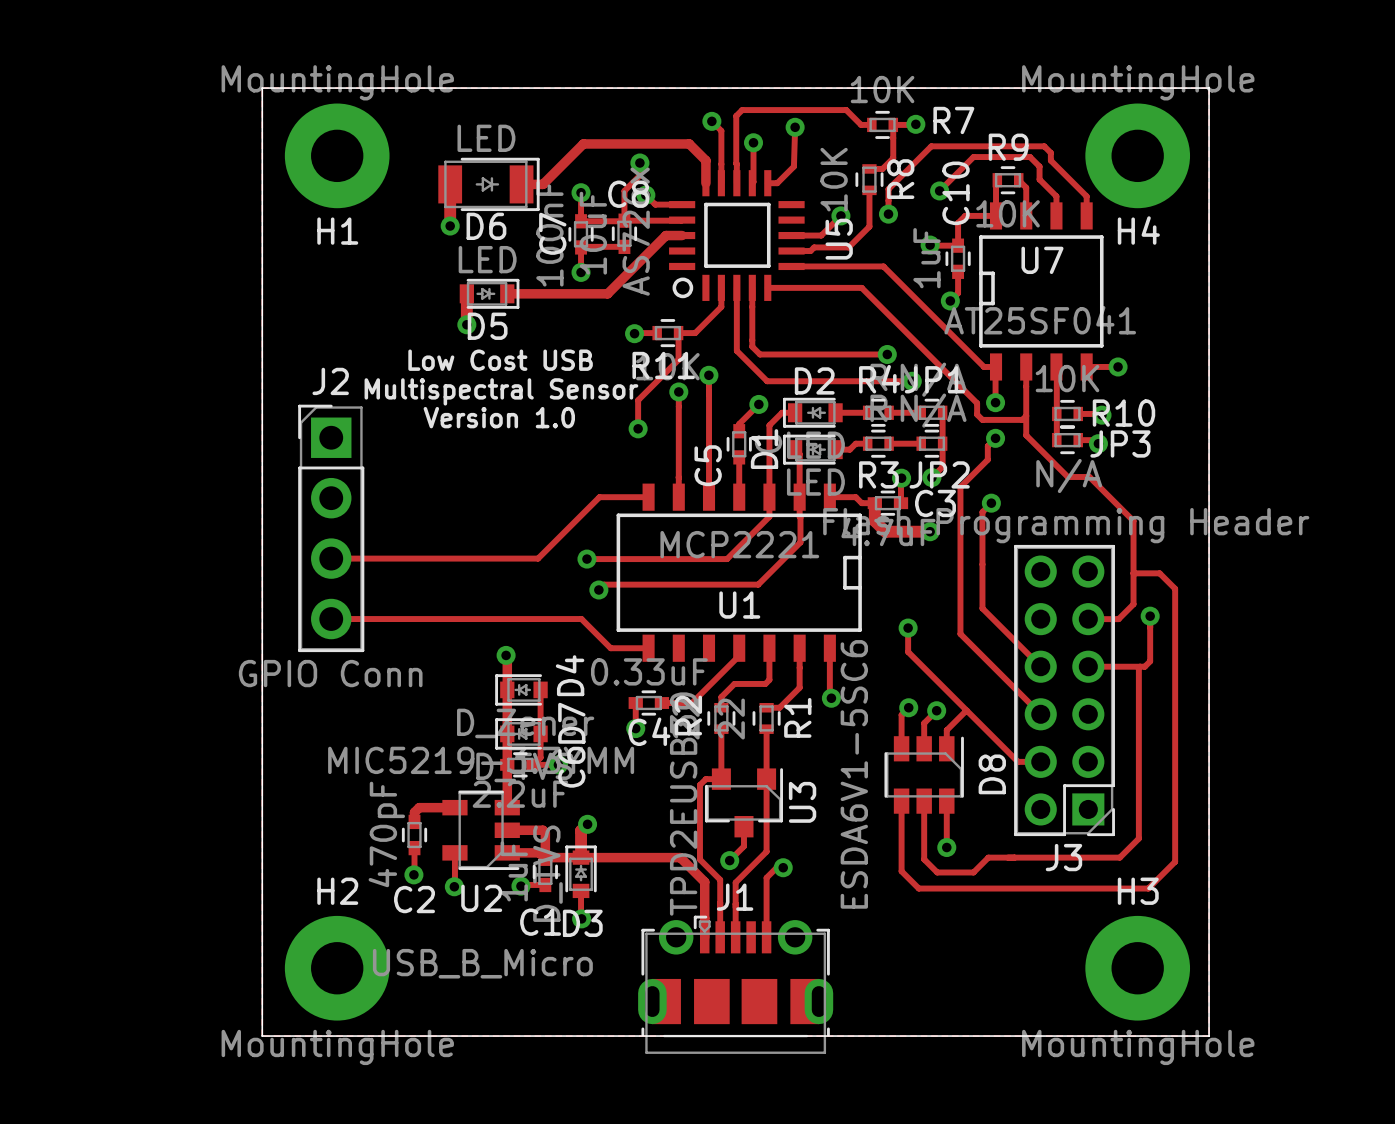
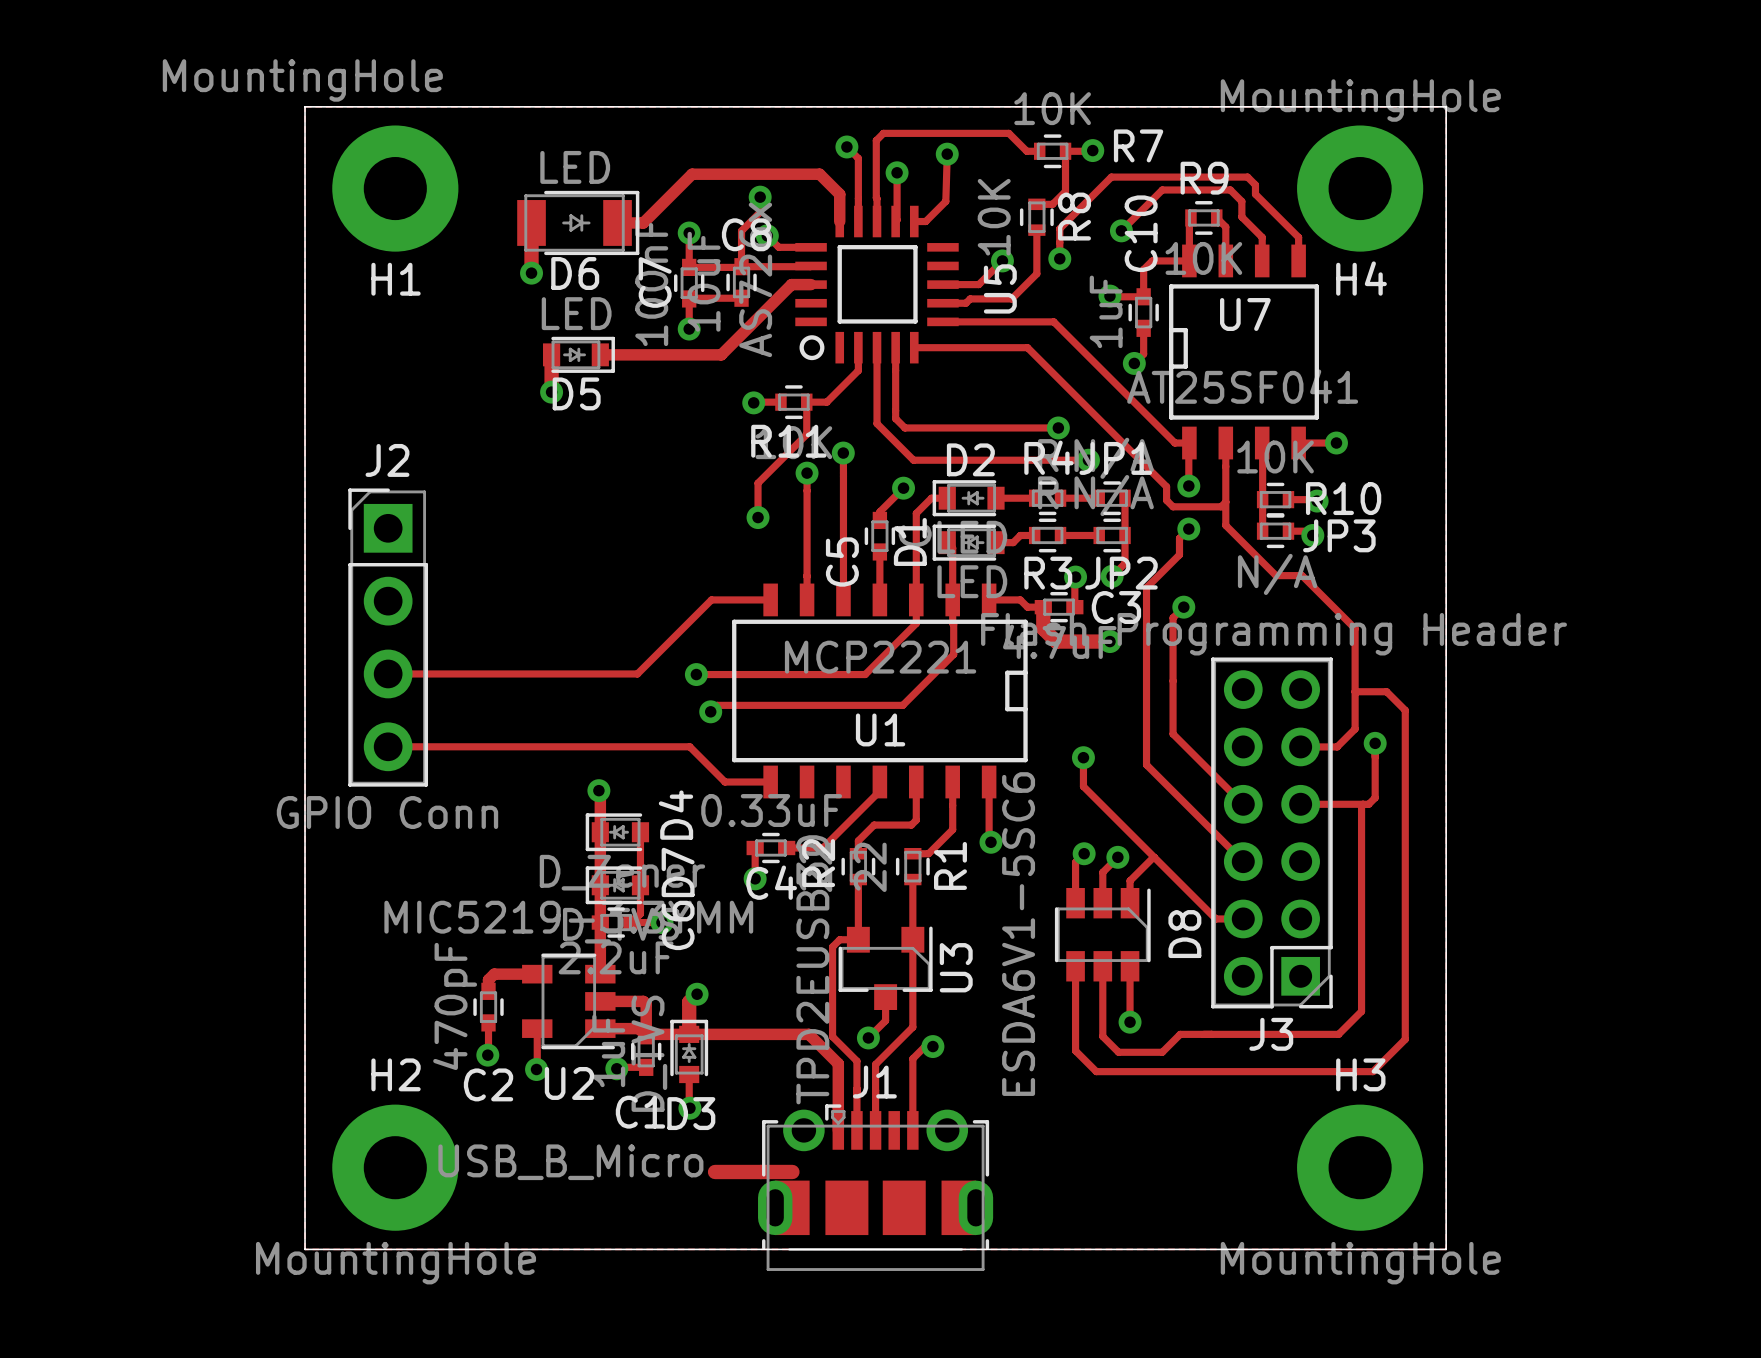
H1 value position: MountingHole (337, 82) -> MountingHole (302, 80)
text: Low Cost USB (500, 360) -> none
text: Multispectral Sensor (501, 391) -> none
text: Version 1.0 (499, 417) -> none
track: none -> (715, 1171) (792, 1171)

